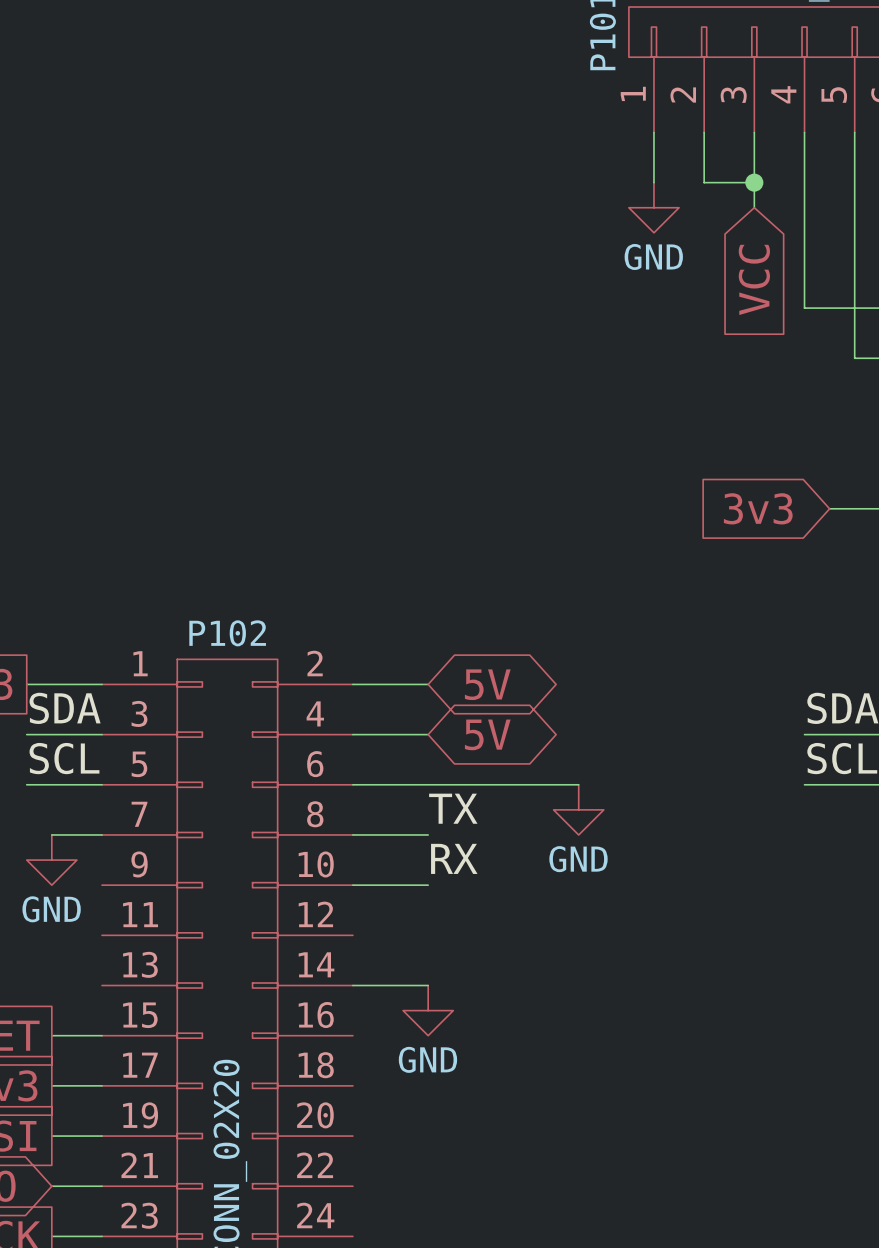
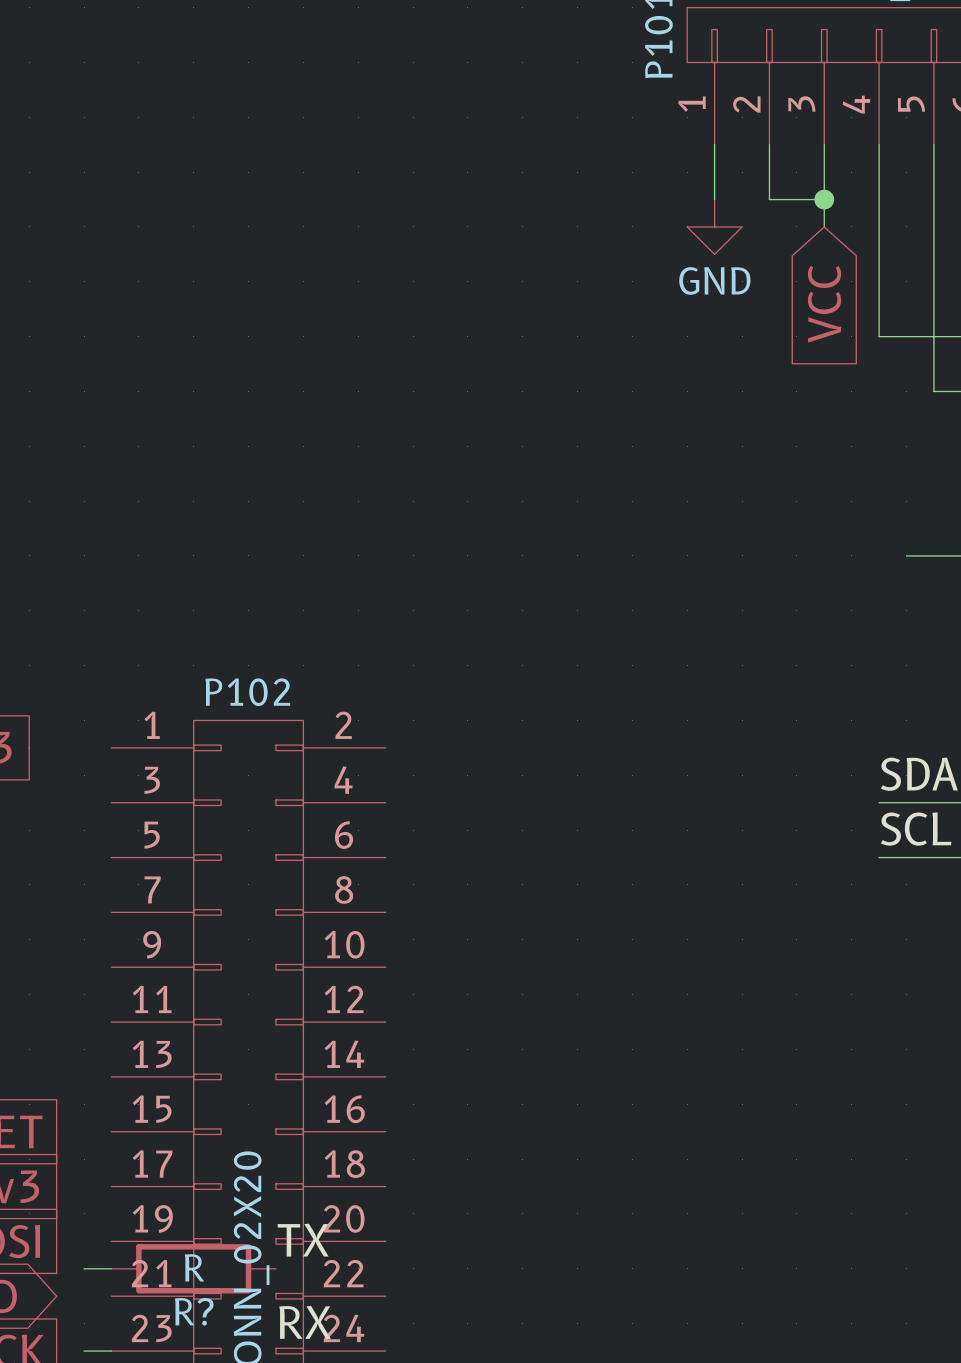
global label: 3v3 (758, 508) -> none
wire: (26, 684) (102, 684) -> none
wire: (352, 684) (428, 684) -> none
global label: 5V (487, 684) -> none
label: SDA (65, 708) -> none
wire: (26, 734) (102, 734) -> none
wire: (352, 734) (428, 734) -> none
global label: 5V (487, 734) -> none
label: SCL (64, 758) -> none
wire: (26, 784) (102, 784) -> none
wire: (352, 784) (578, 784) -> none
label position: TX (453, 808) -> TX (303, 1240)
power symbol: GND (578, 809) -> none
wire: (51, 834) (102, 834) -> none
wire: (352, 834) (428, 834) -> none
label position: RX (454, 858) -> RX (305, 1322)
power symbol: GND (51, 860) -> none
wire: (352, 885) (428, 885) -> none
wire: (352, 985) (428, 985) -> none
power symbol: GND (428, 1010) -> none
wire: (51, 1035) (102, 1035) -> none
wire: (51, 1085) (102, 1085) -> none
wire: (51, 1136) (102, 1136) -> none
R?: none -> R (193, 1268)
wire: (51, 1186) (102, 1186) -> none
wire: (51, 1236) (76, 1236) -> (84, 1268) (111, 1268)

